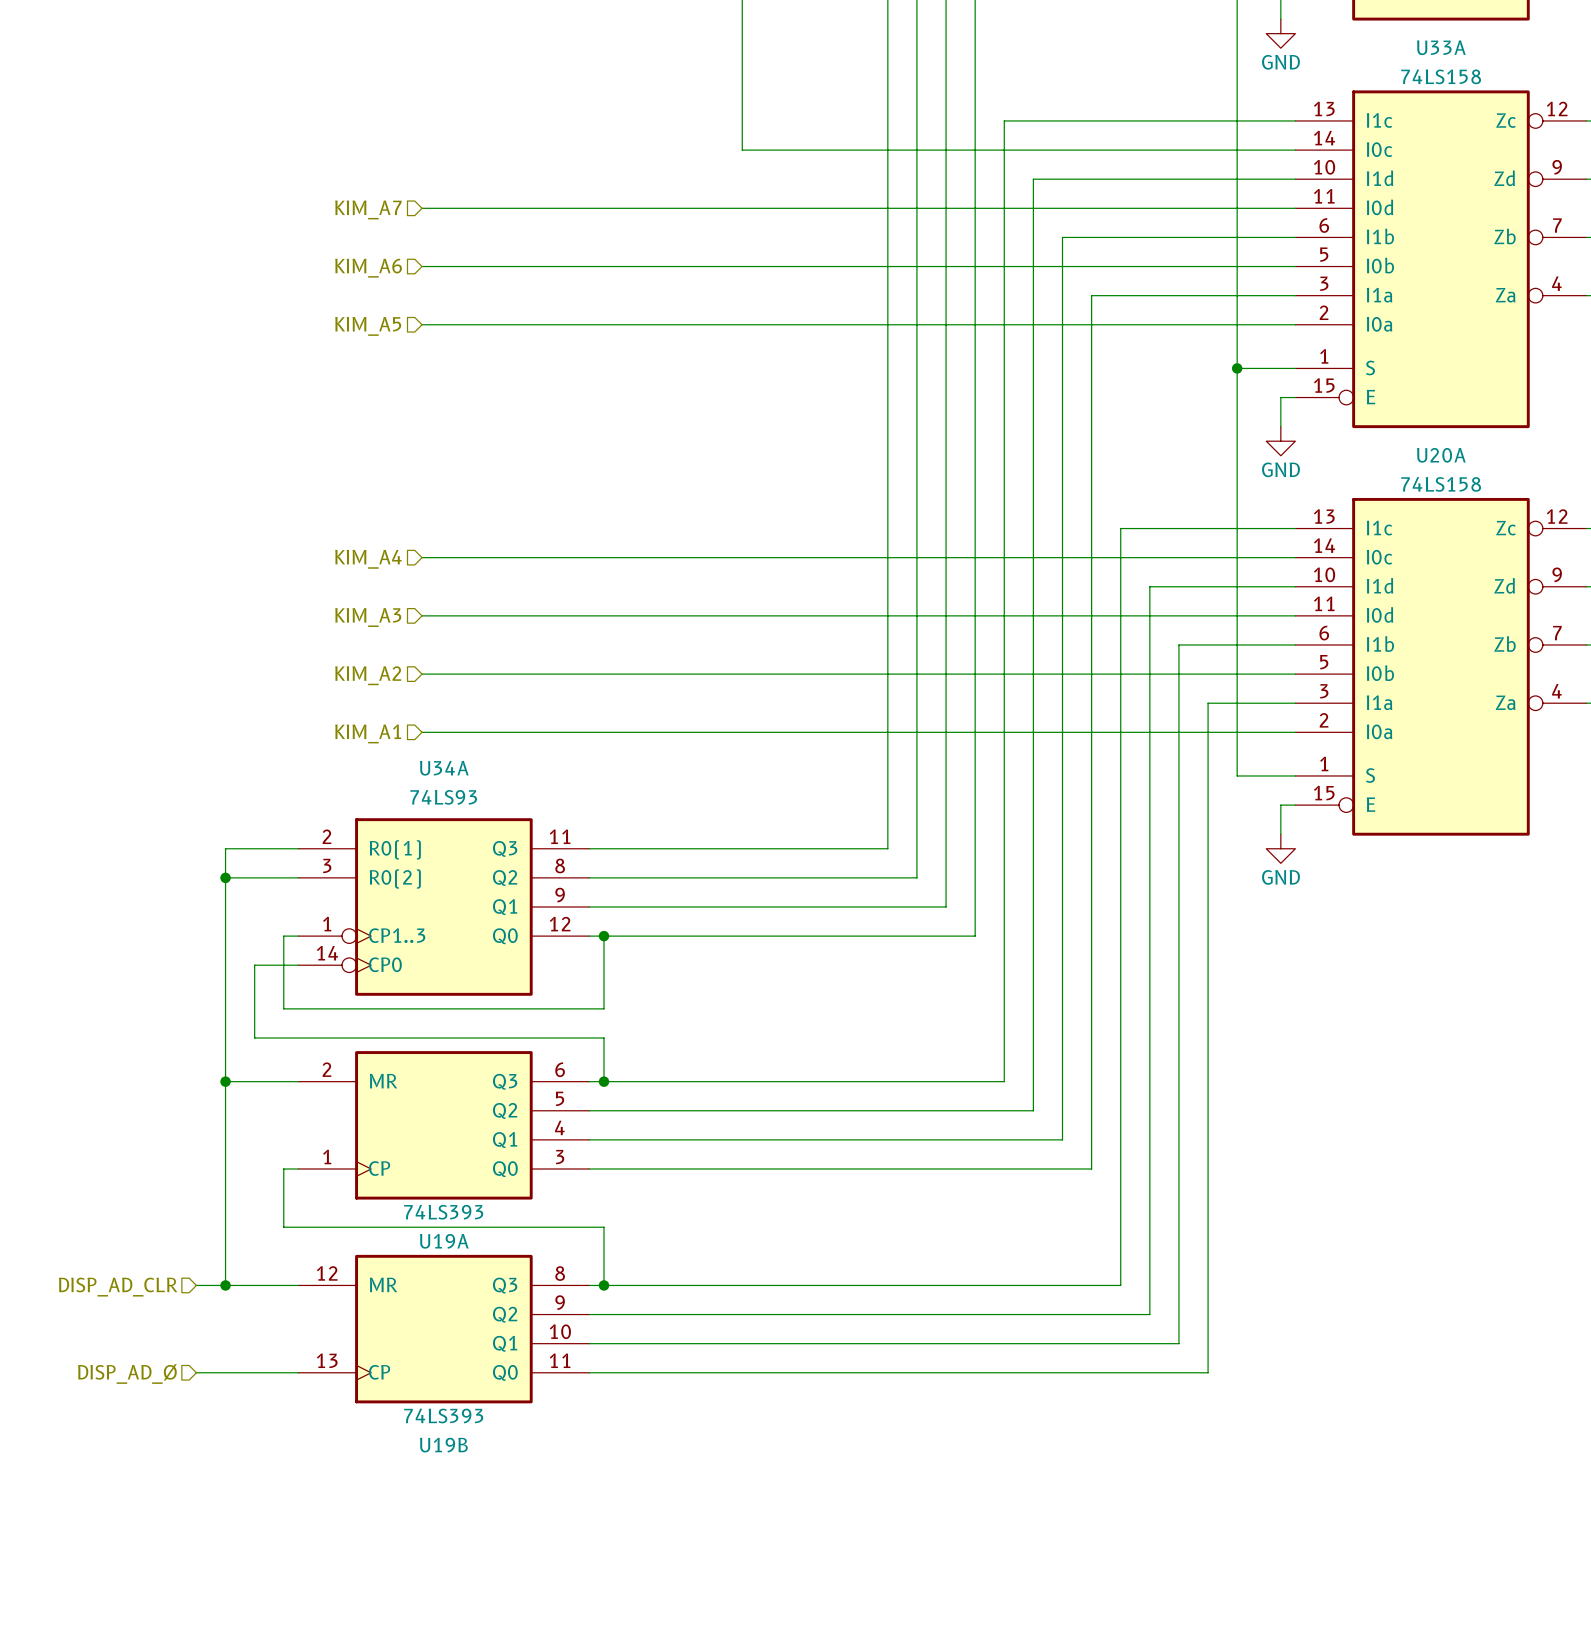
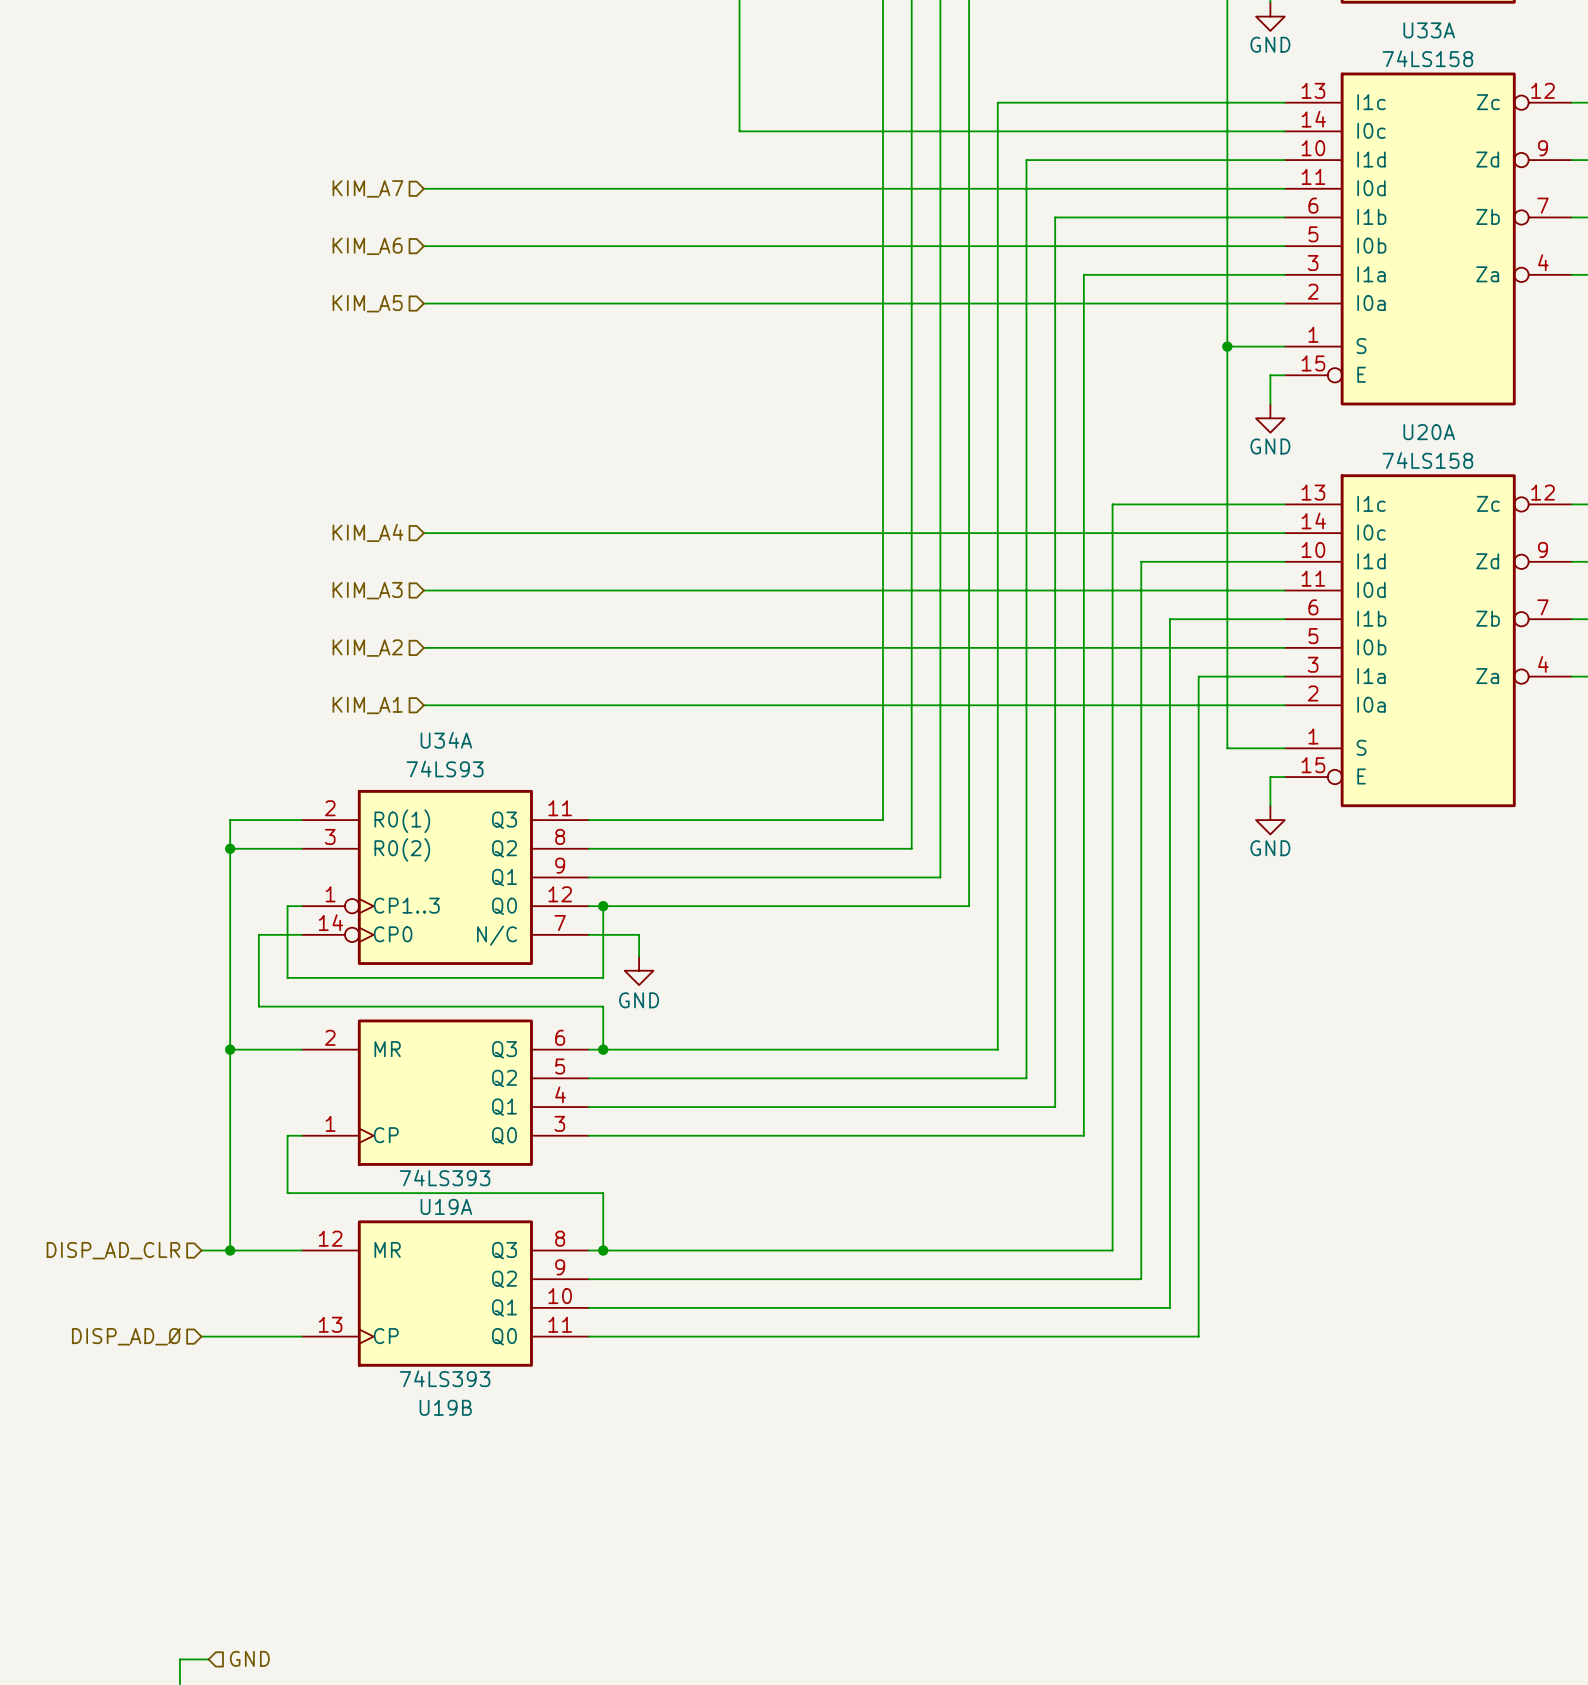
U34A symbol: [298, 818, 590, 996] -> [301, 789, 589, 965]
wire: none -> (588, 934) (639, 934) (639, 956)
power symbol: none -> GND (639, 970)

